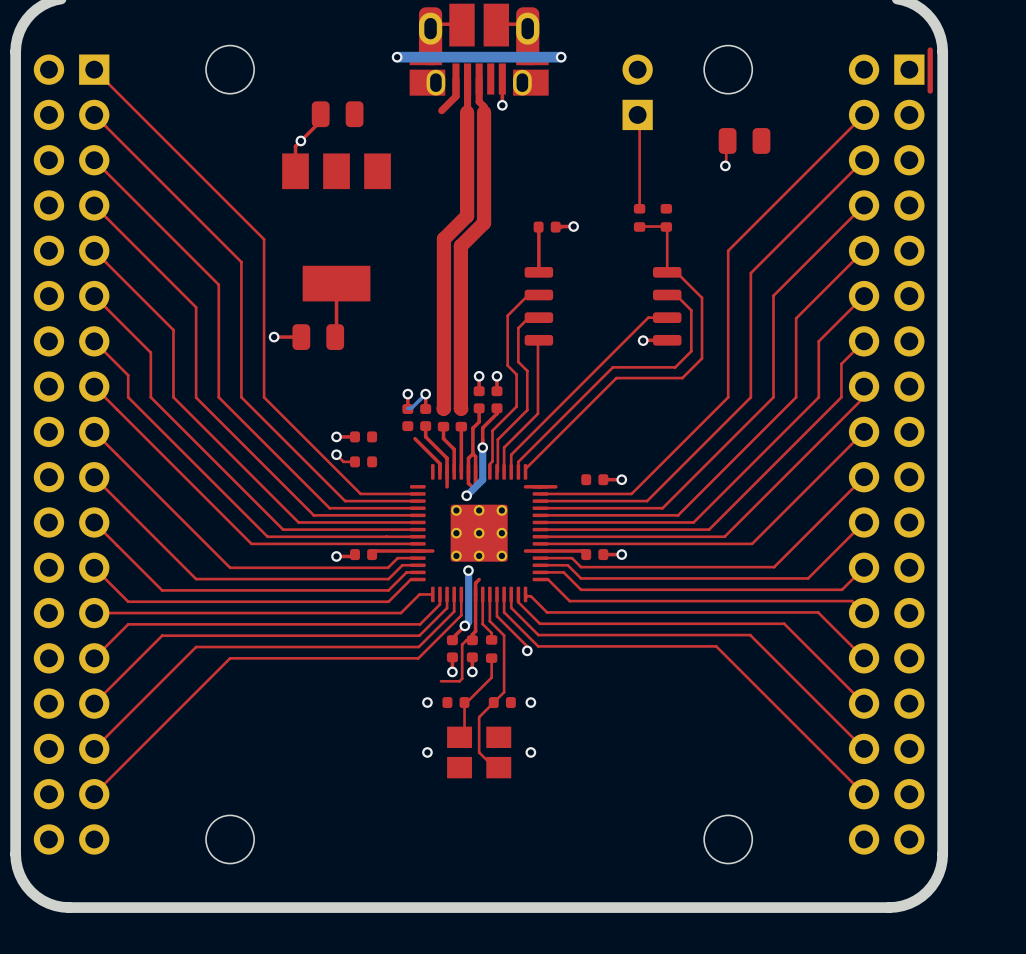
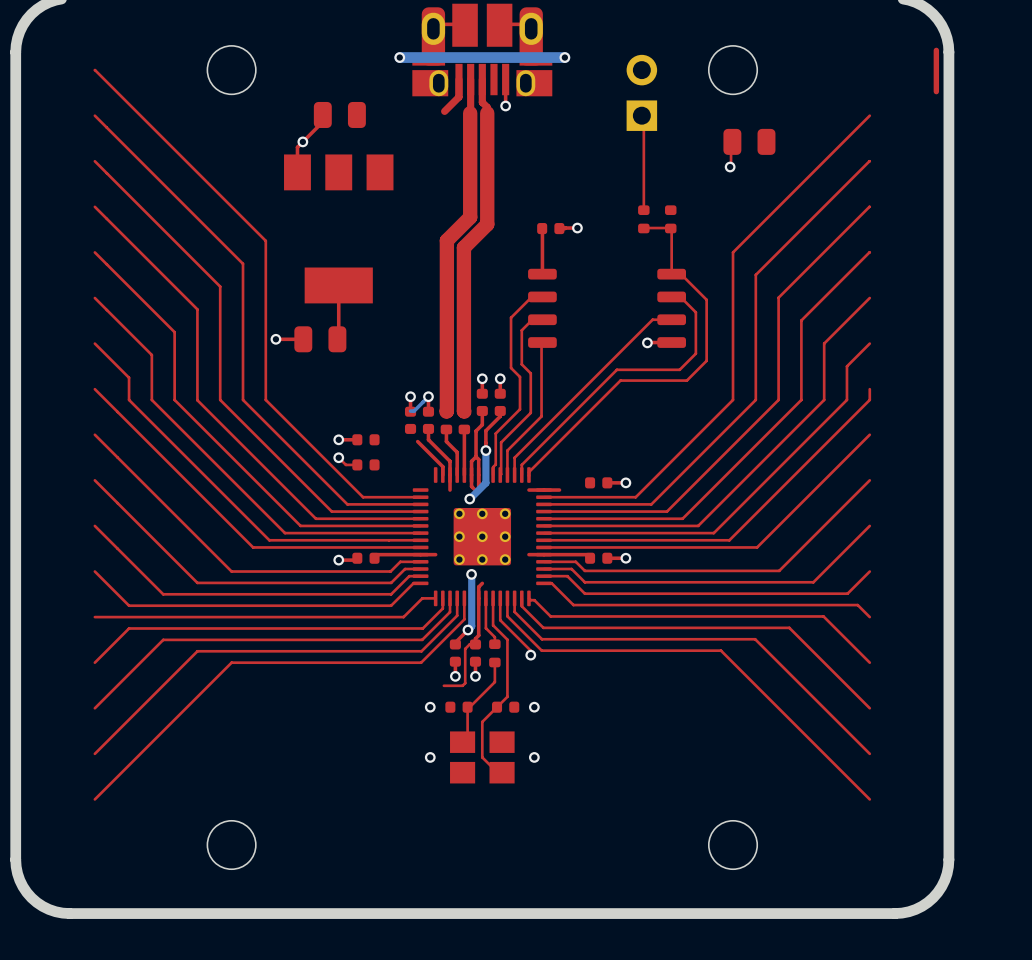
part: (71, 454) -> none
part: (886, 454) -> none

